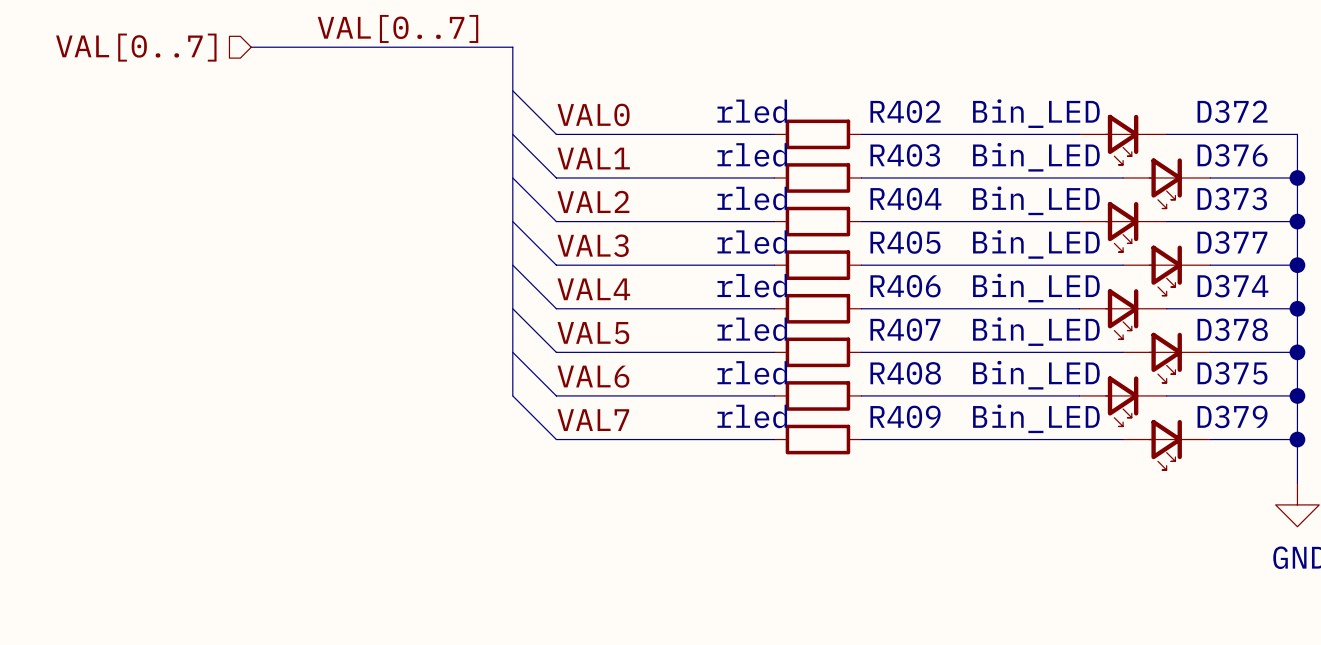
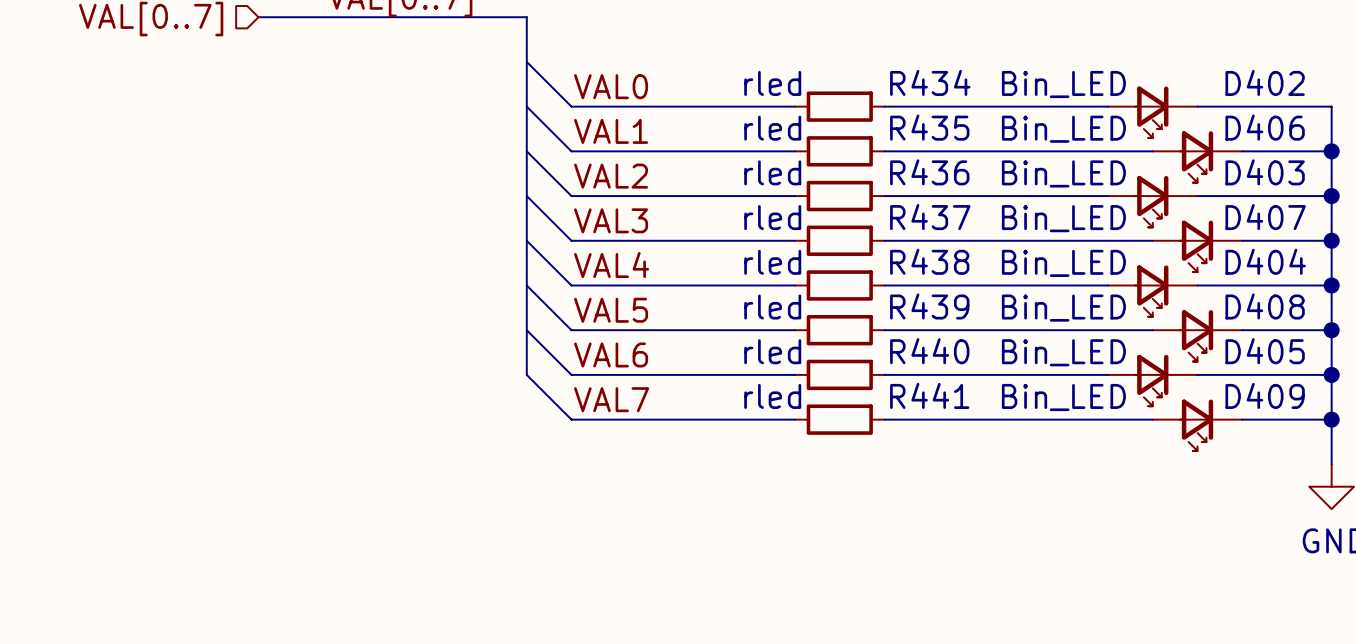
R402 name: R402 (905, 111) -> R434 (930, 82)
D372 name: D372 (1232, 111) -> D402 (1265, 82)
R403 name: R403 (905, 155) -> R435 (929, 127)
D376 name: D376 (1232, 155) -> D406 (1265, 127)
R404 name: R404 (905, 198) -> R436 (929, 172)
D373 name: D373 (1232, 198) -> D403 (1265, 172)
R405 name: R405 (905, 242) -> R437 (930, 217)
D377 name: D377 (1232, 242) -> D407 (1265, 217)
R406 name: R406 (905, 286) -> R438 (929, 261)
D374 name: D374 (1232, 286) -> D404 (1265, 261)
R407 name: R407 (905, 329) -> R439 (929, 306)
D378 name: D378 (1232, 329) -> D408 (1265, 306)
R408 name: R408 (905, 373) -> R440 (929, 351)
D375 name: D375 (1232, 373) -> D405 (1265, 351)
R409 name: R409 (905, 416) -> R441 (929, 395)
D379 name: D379 (1232, 416) -> D409 (1265, 395)

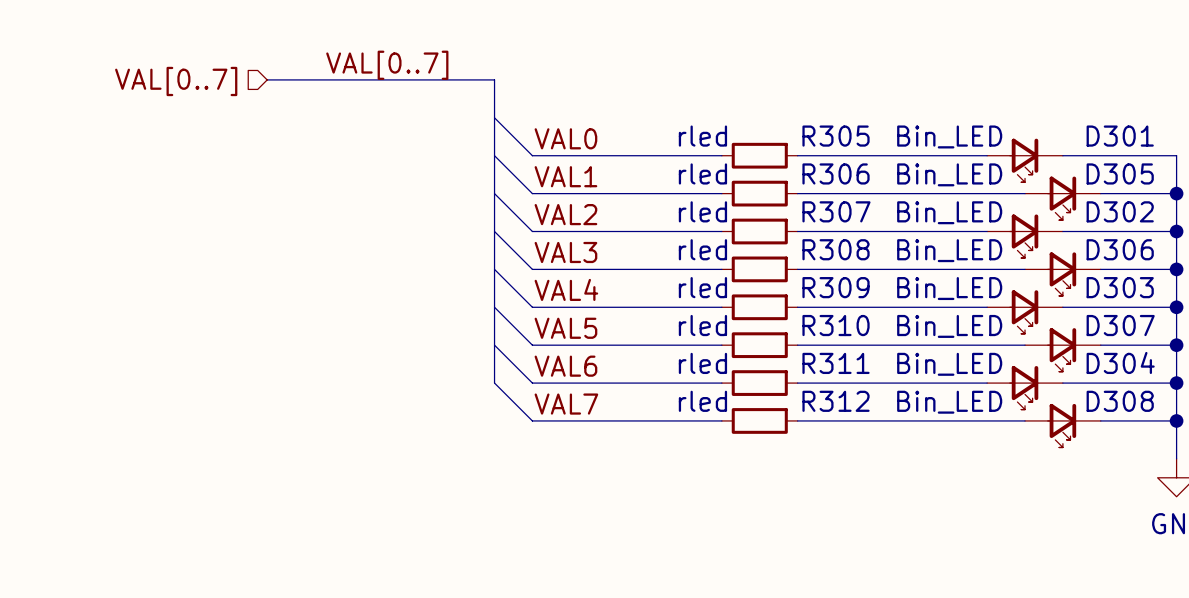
R434 name: R434 (930, 82) -> R305 (836, 136)
D402 name: D402 (1265, 82) -> D301 (1120, 136)
R435 name: R435 (929, 127) -> R306 (836, 173)
D406 name: D406 (1265, 127) -> D305 (1120, 173)
R436 name: R436 (929, 172) -> R307 (836, 211)
D403 name: D403 (1265, 172) -> D302 (1120, 211)
R437 name: R437 (930, 217) -> R308 (836, 249)
D407 name: D407 (1265, 217) -> D306 (1120, 249)
R438 name: R438 (929, 261) -> R309 (836, 287)
D404 name: D404 (1265, 261) -> D303 (1120, 287)
R439 name: R439 (929, 306) -> R310 (836, 325)
D408 name: D408 (1265, 306) -> D307 (1120, 325)
R440 name: R440 (929, 351) -> R311 (836, 363)
D405 name: D405 (1265, 351) -> D304 (1120, 362)
R441 name: R441 (929, 395) -> R312 (836, 401)
D409 name: D409 (1265, 395) -> D308 (1120, 401)

